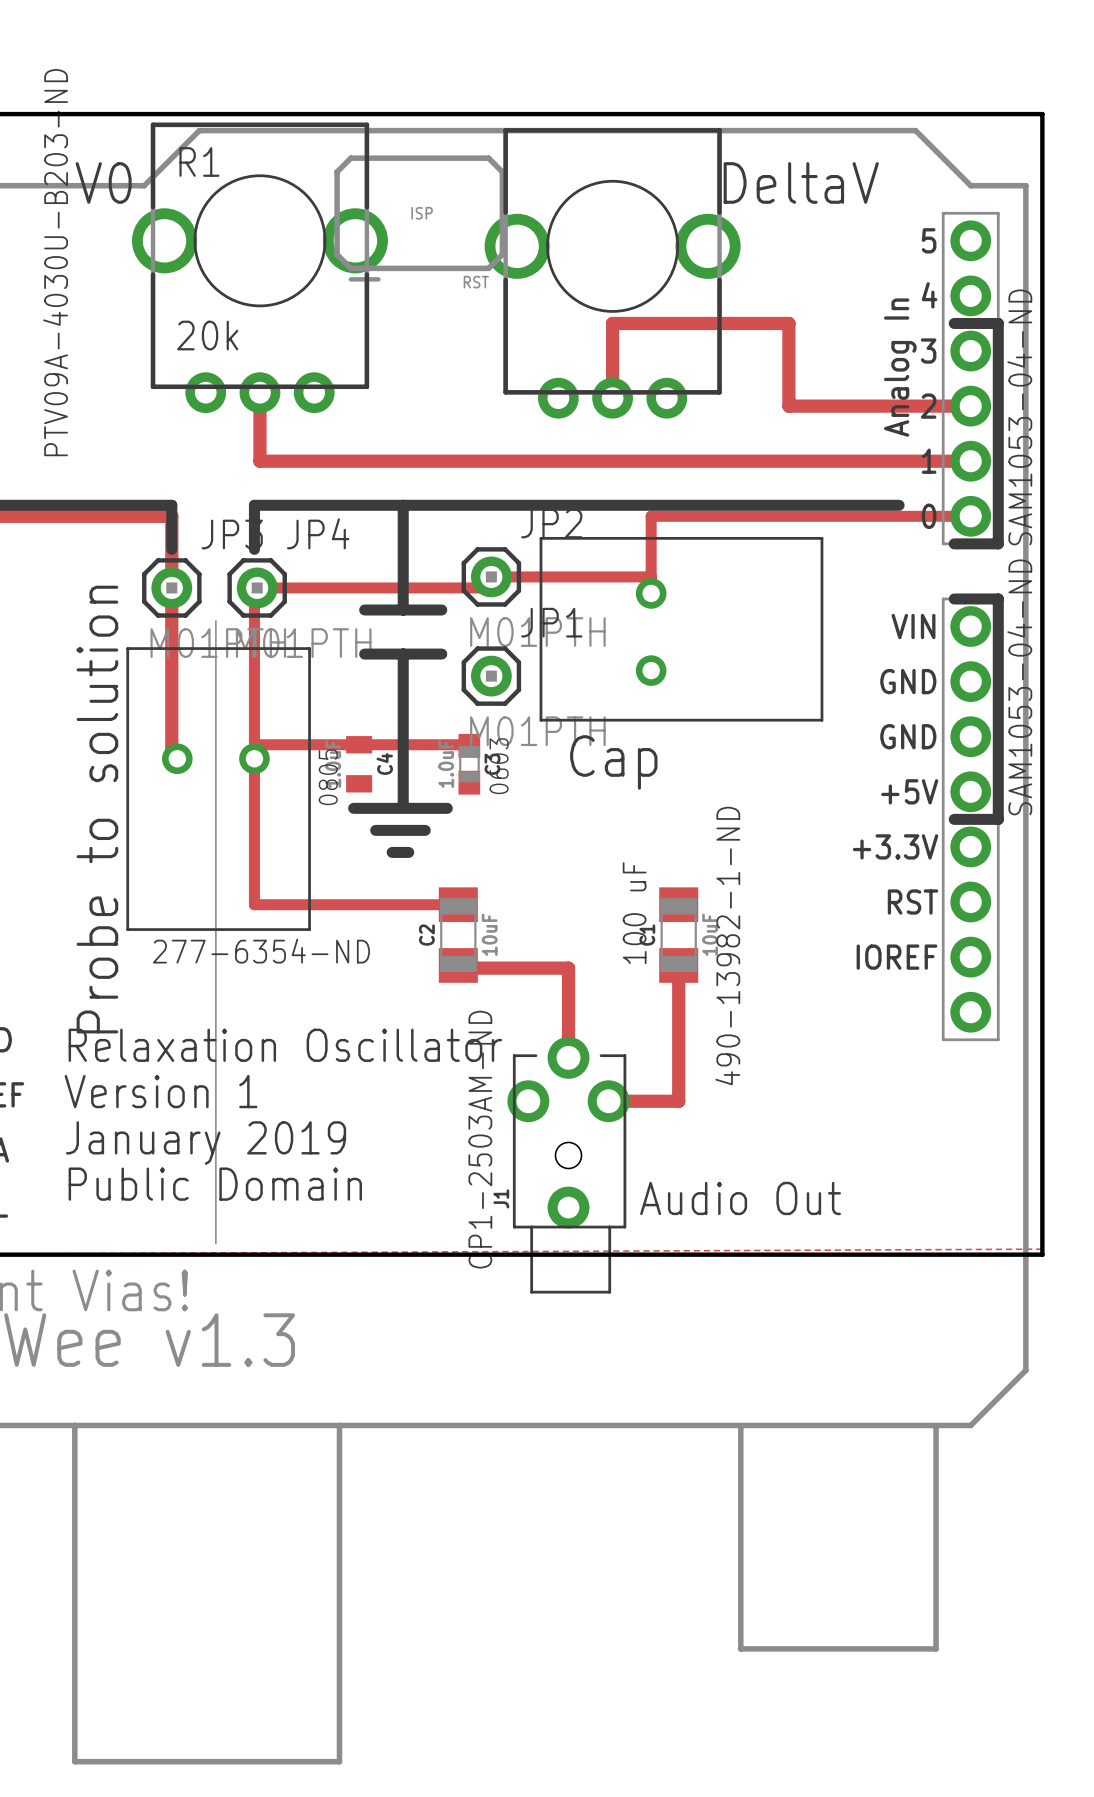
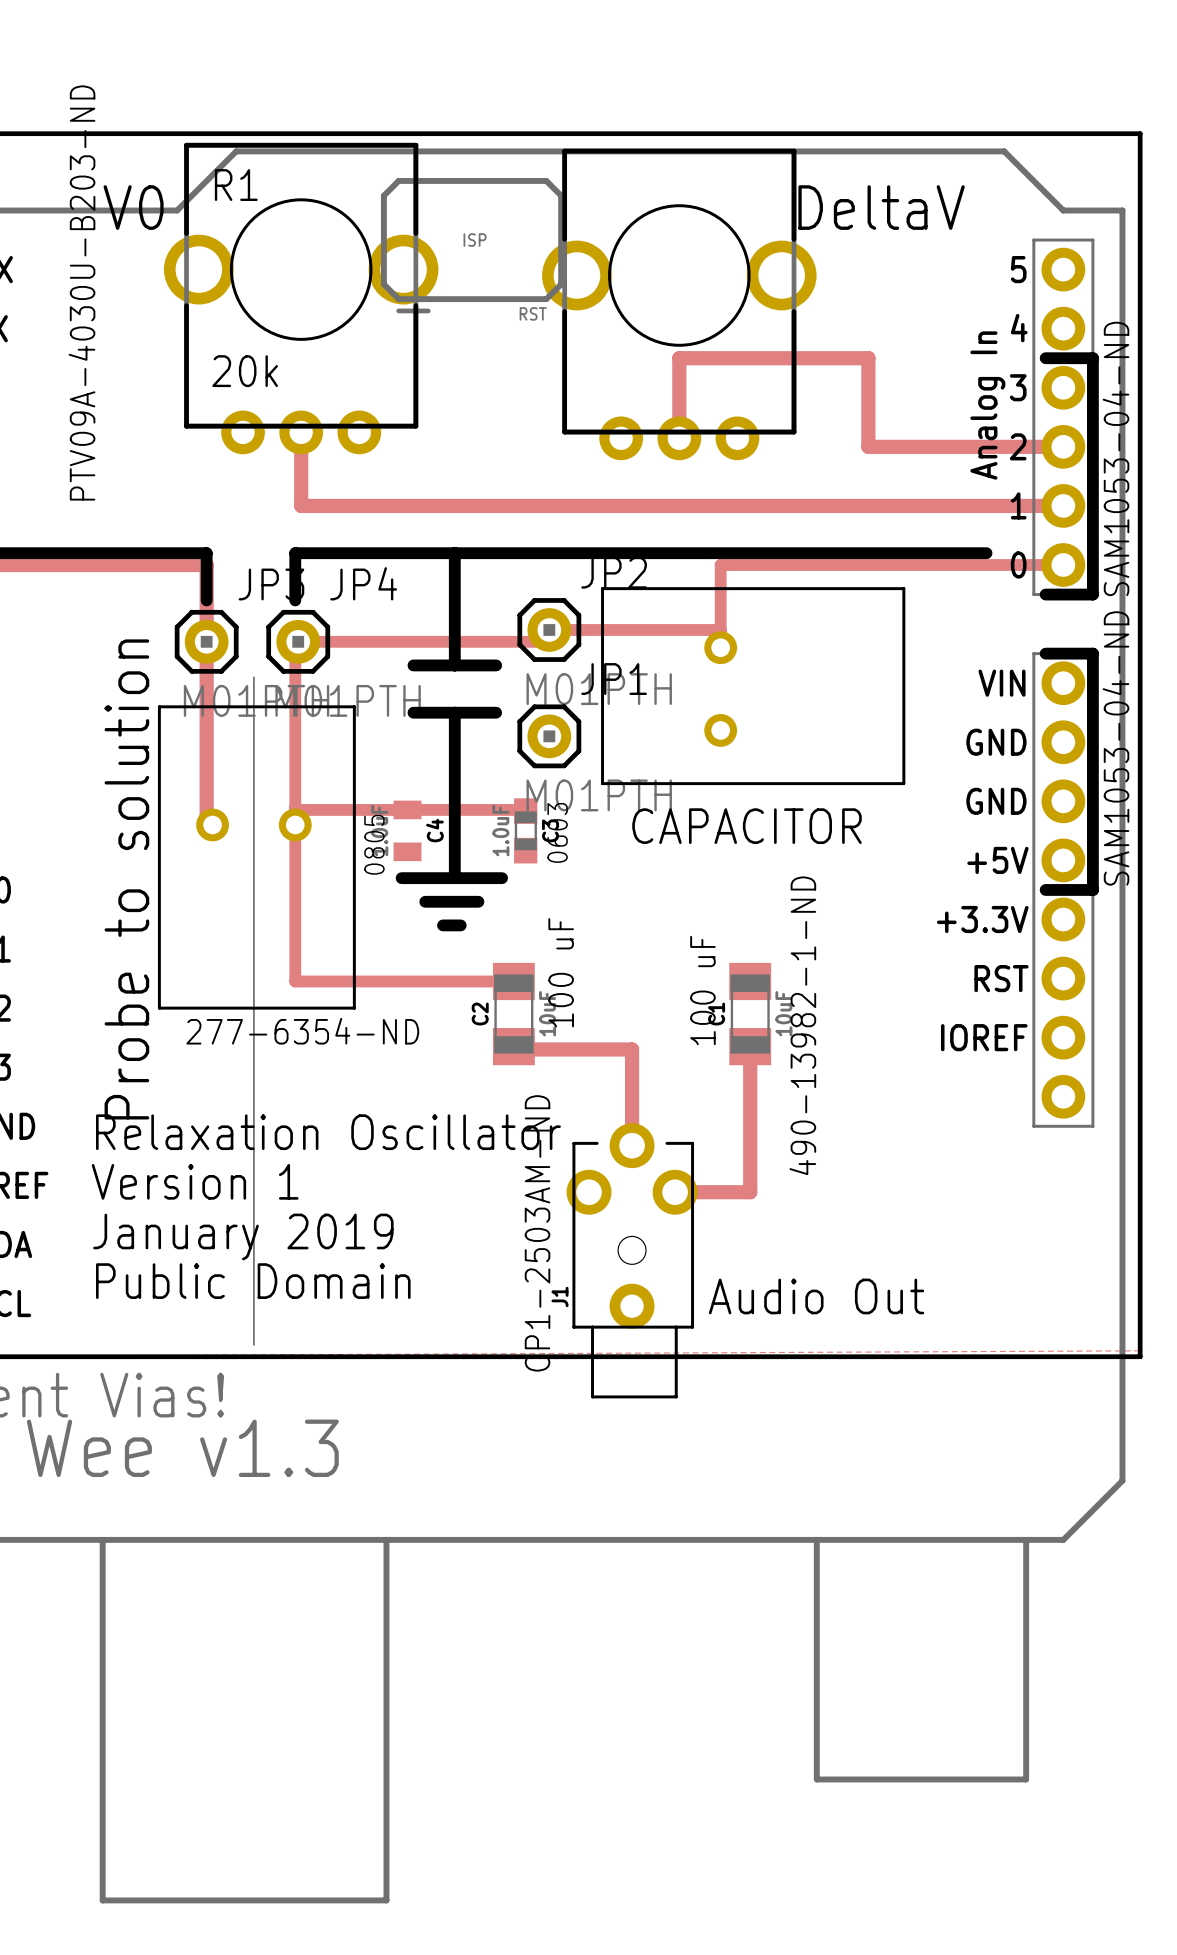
text: Cap (613, 762) -> CAPACITOR (747, 826)
text: none -> 100 uF (561, 972)

